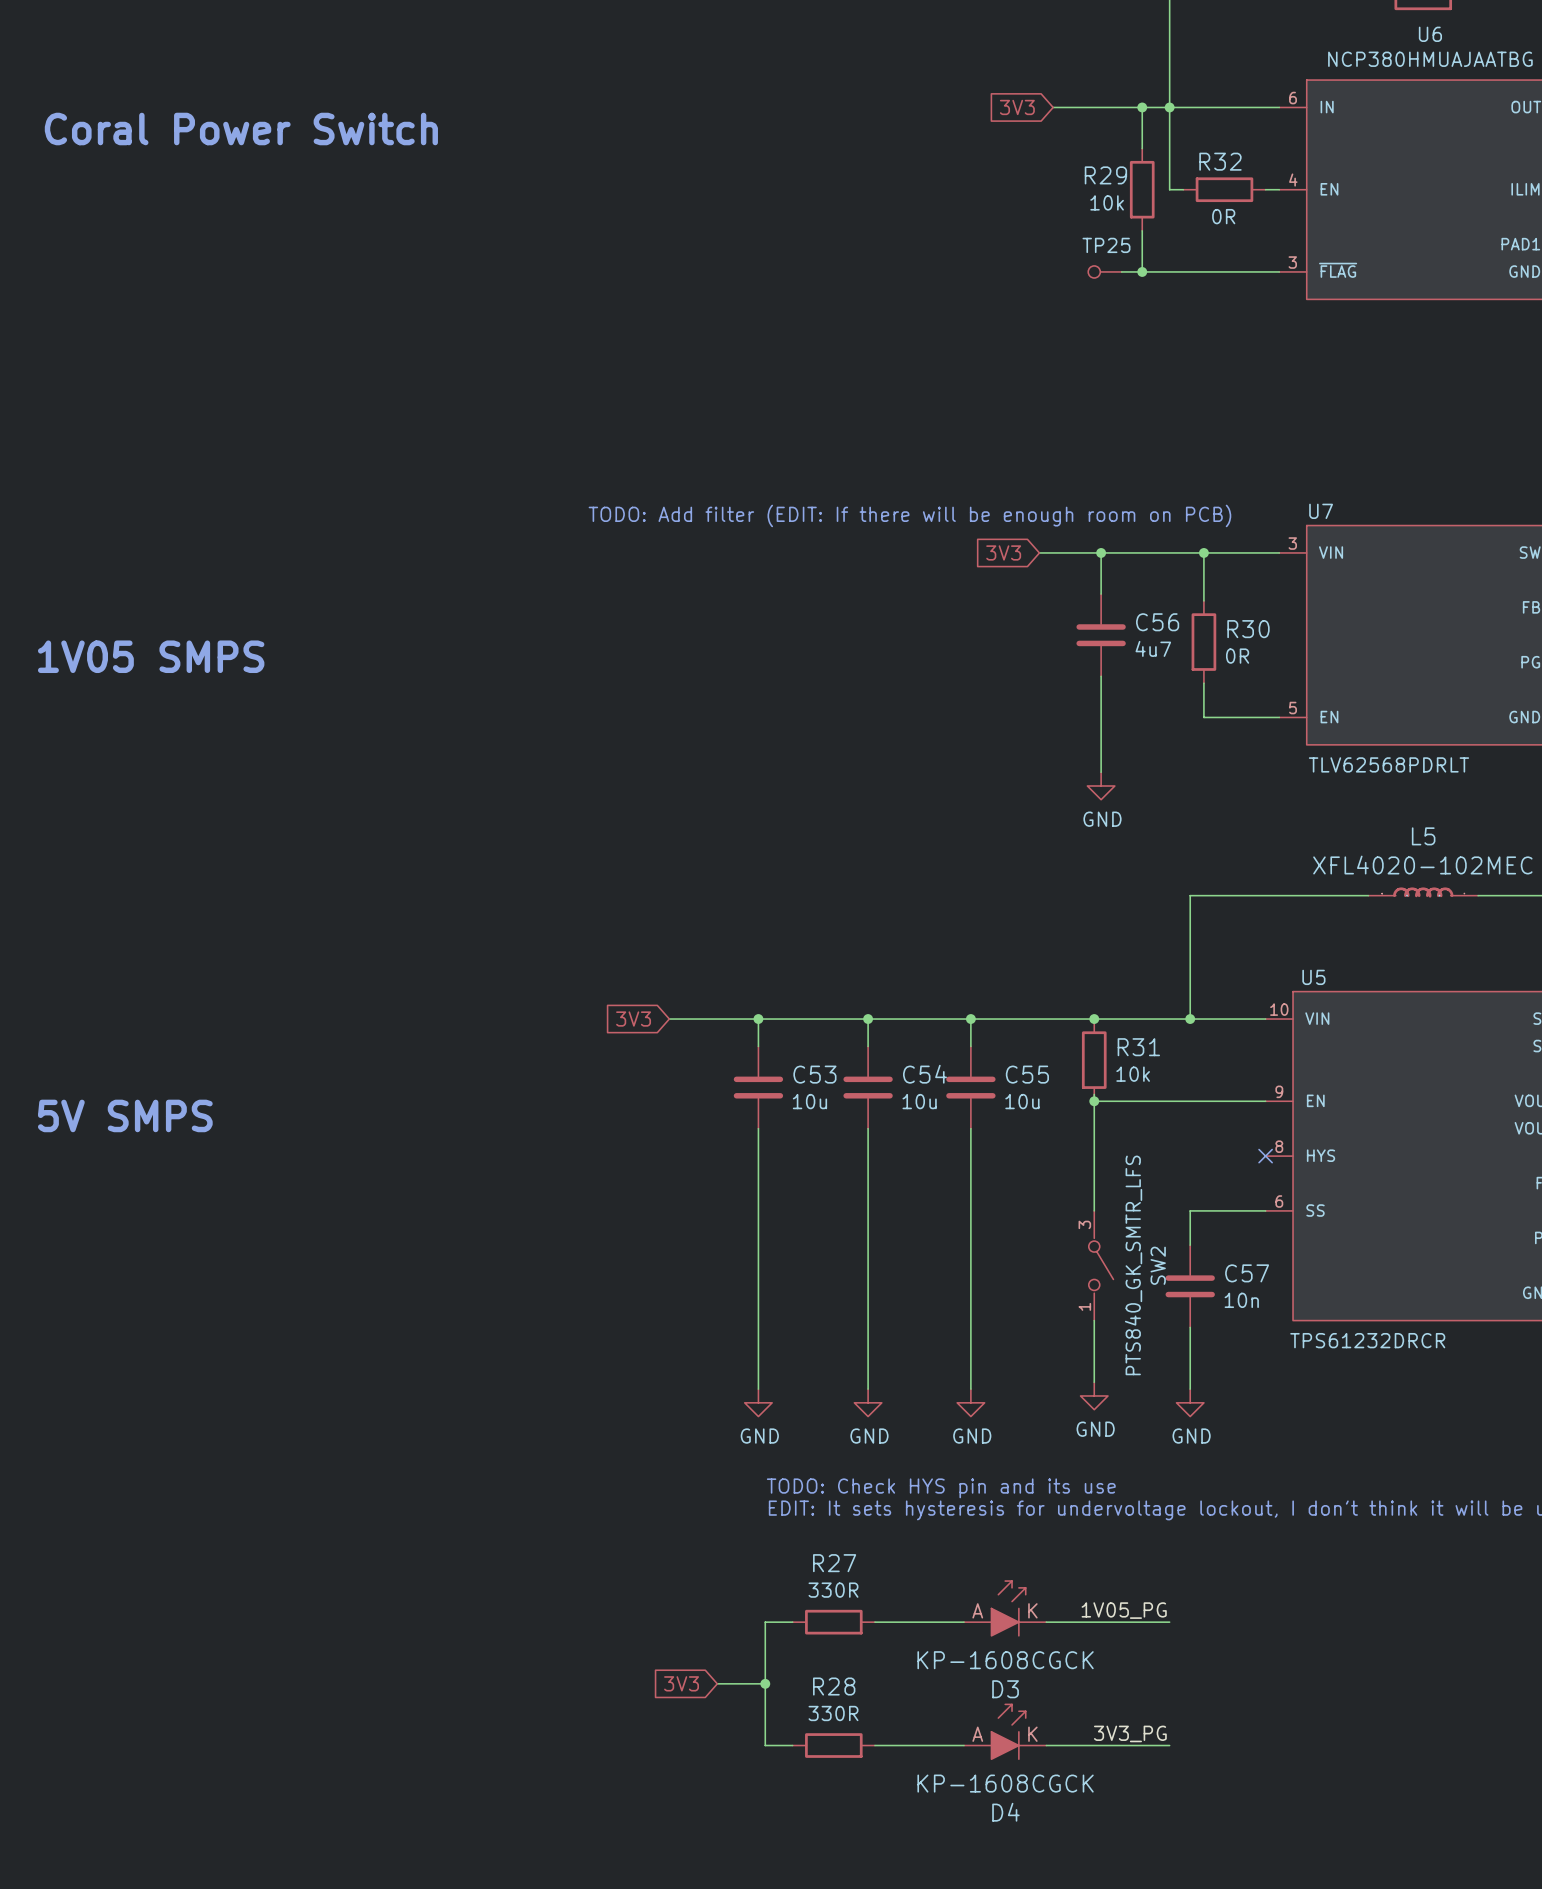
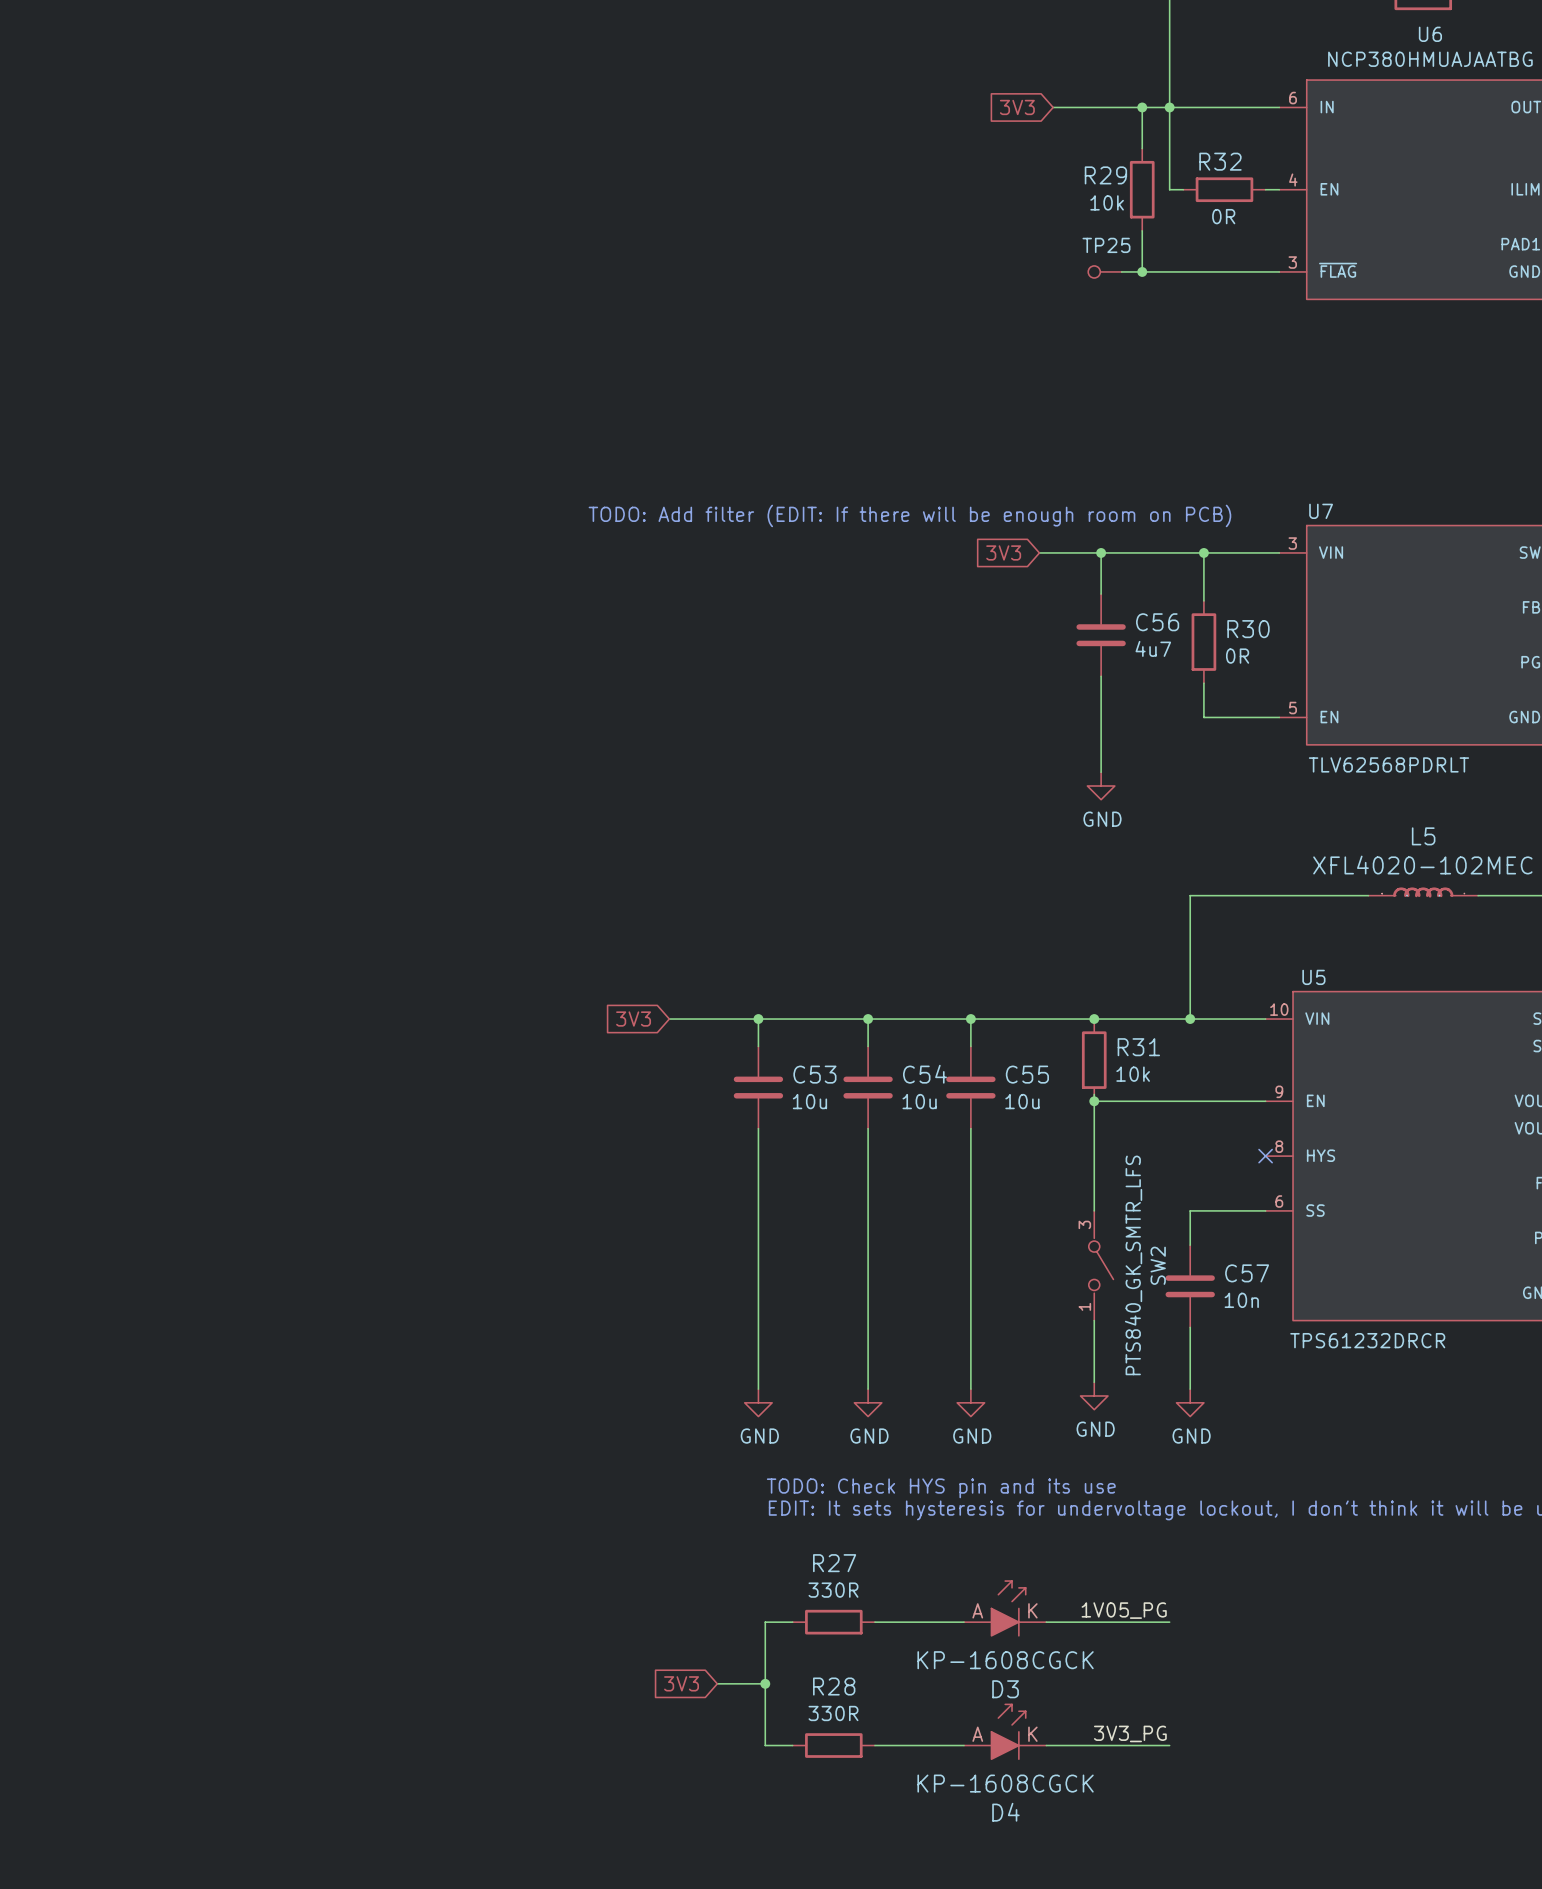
text: Coral Power Switch (241, 129) -> none
text: 1V05 SMPS (151, 656) -> none
text: 5V SMPS (125, 1115) -> none

